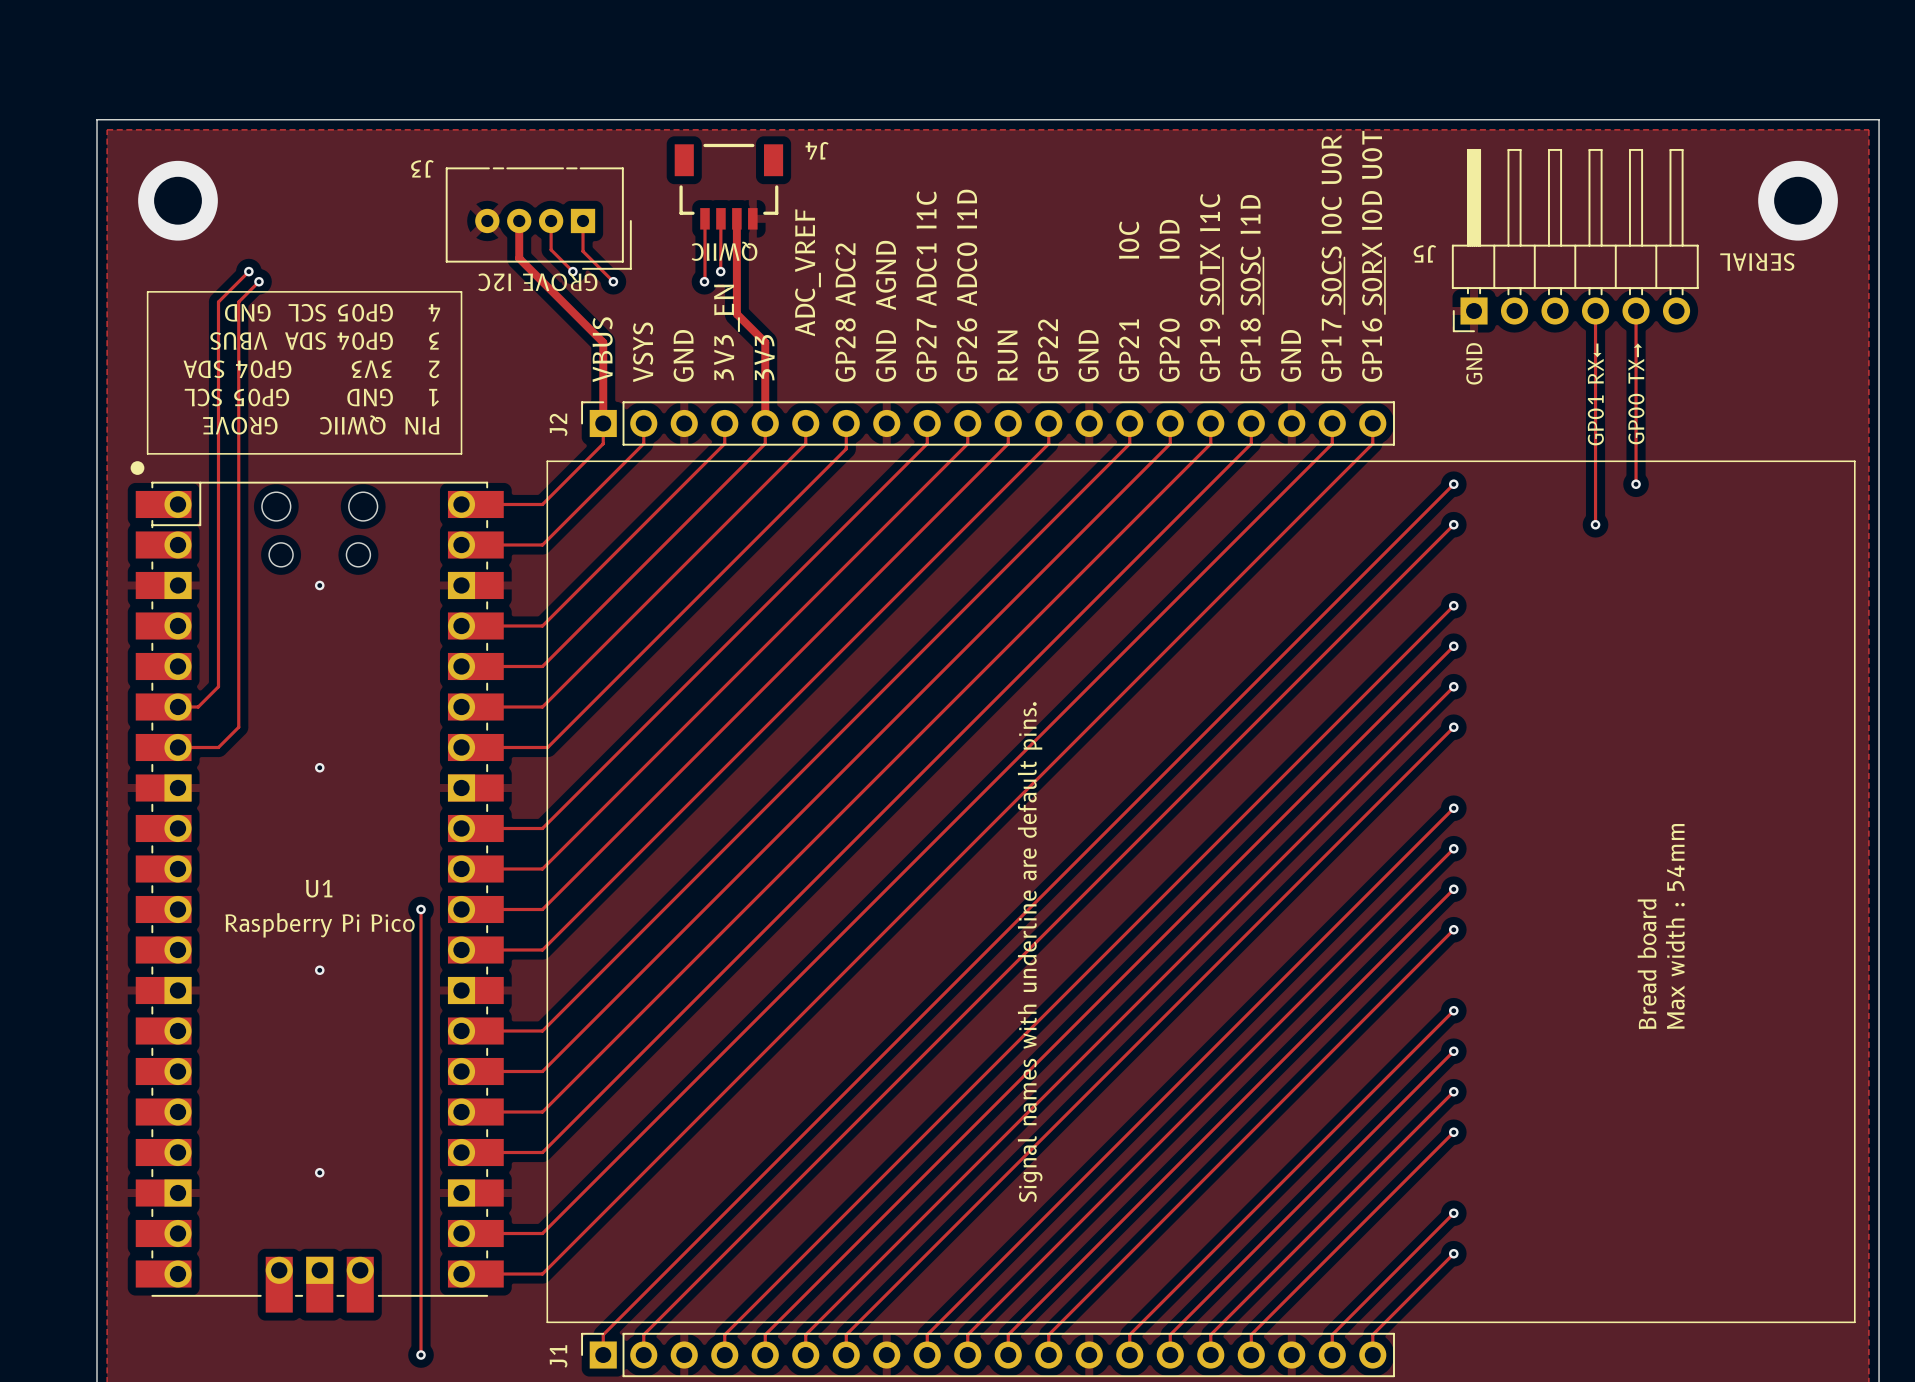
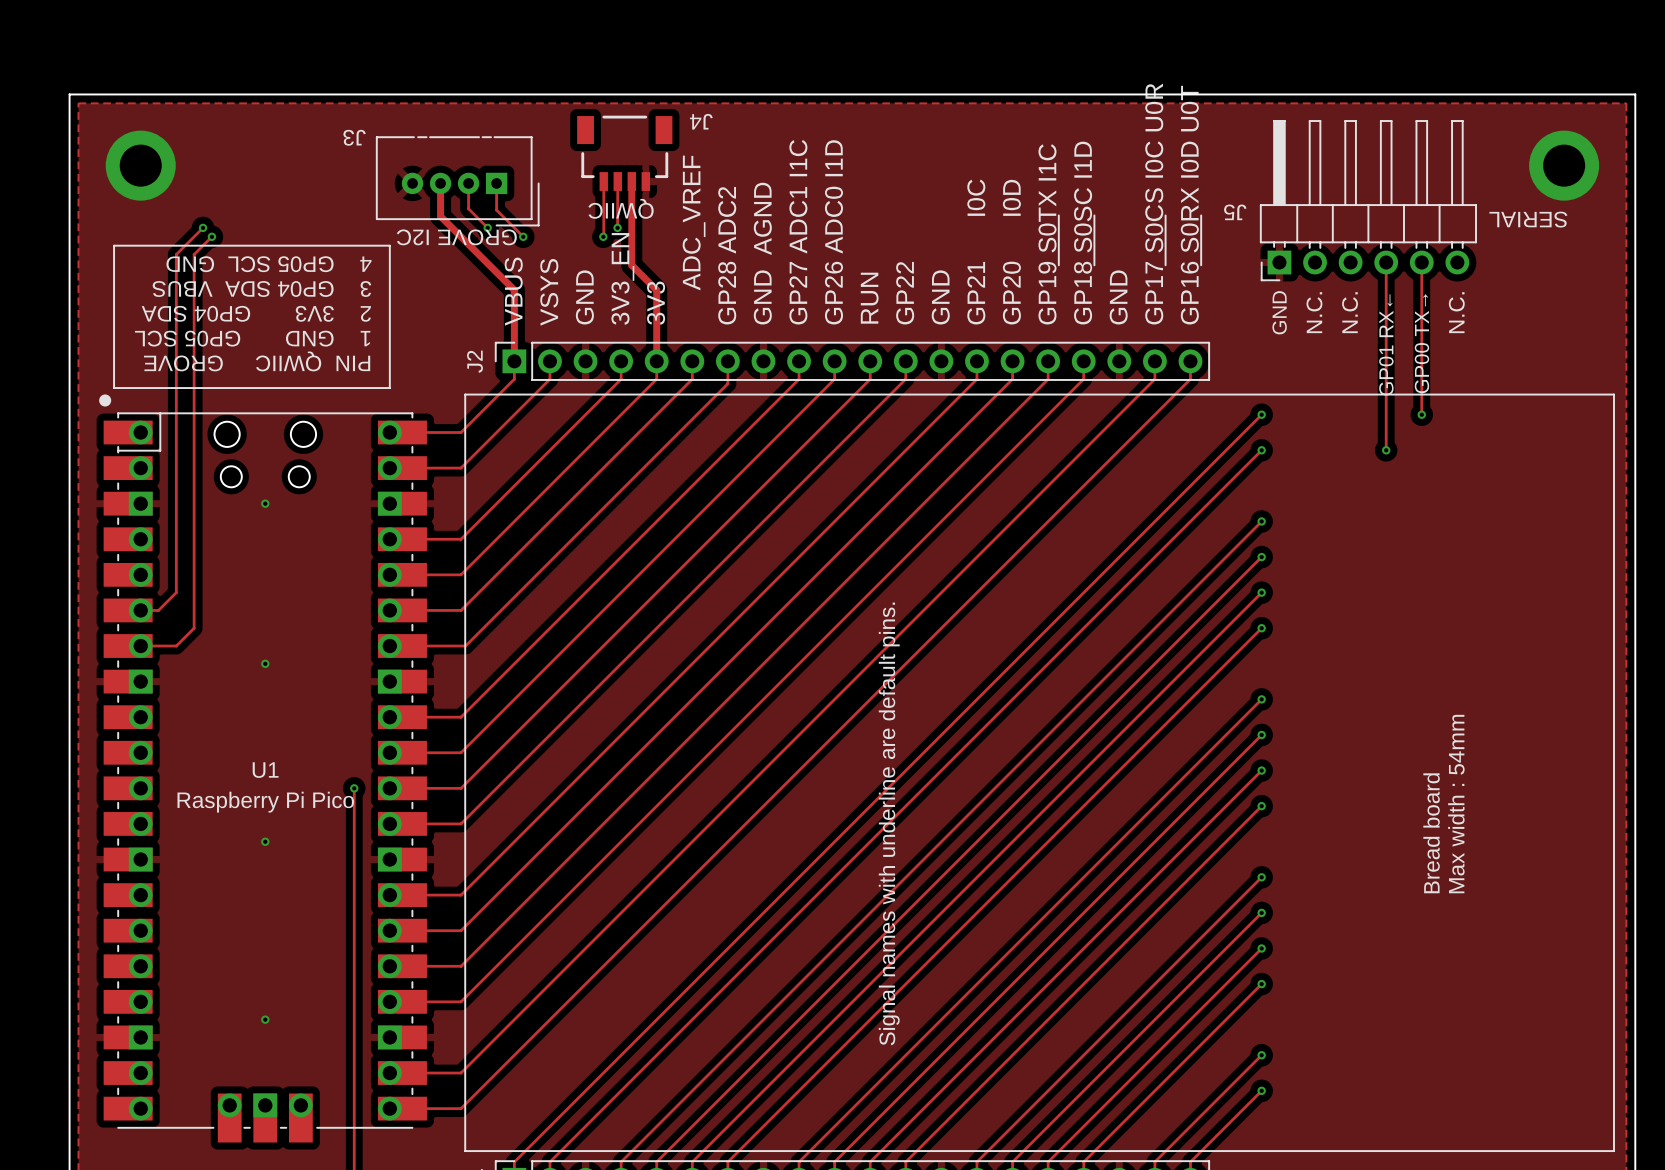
text: none -> N.C. (1314, 312)
text: none -> N.C. (1350, 312)
text: none -> N.C. (1456, 312)

